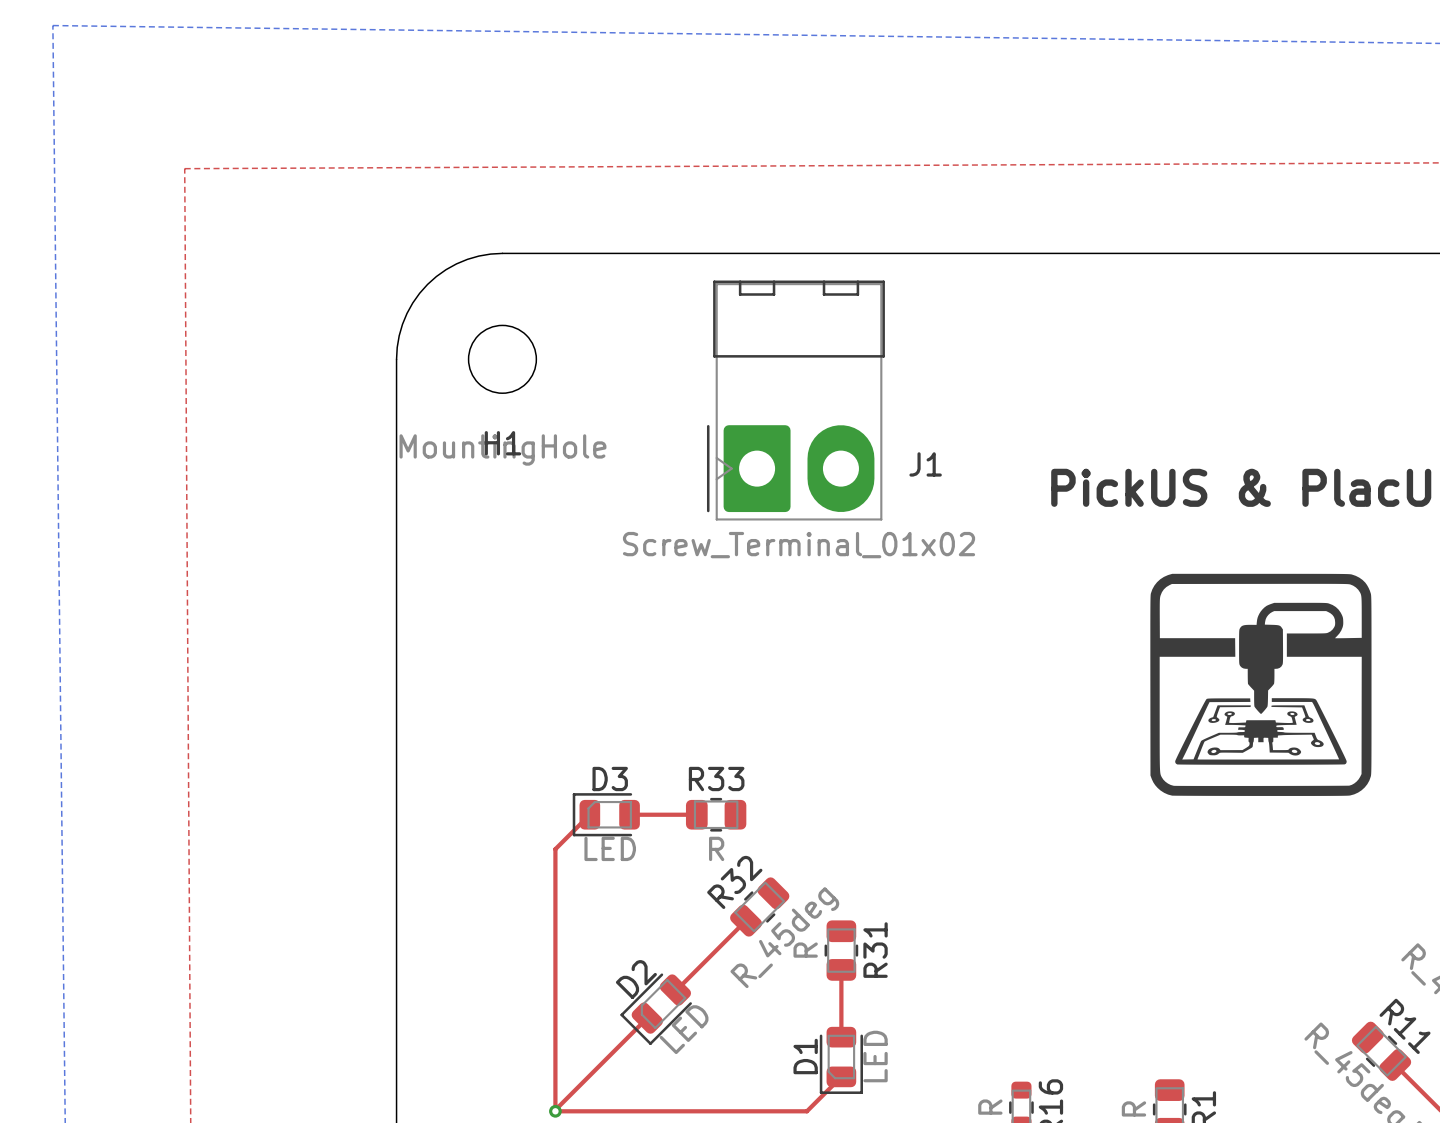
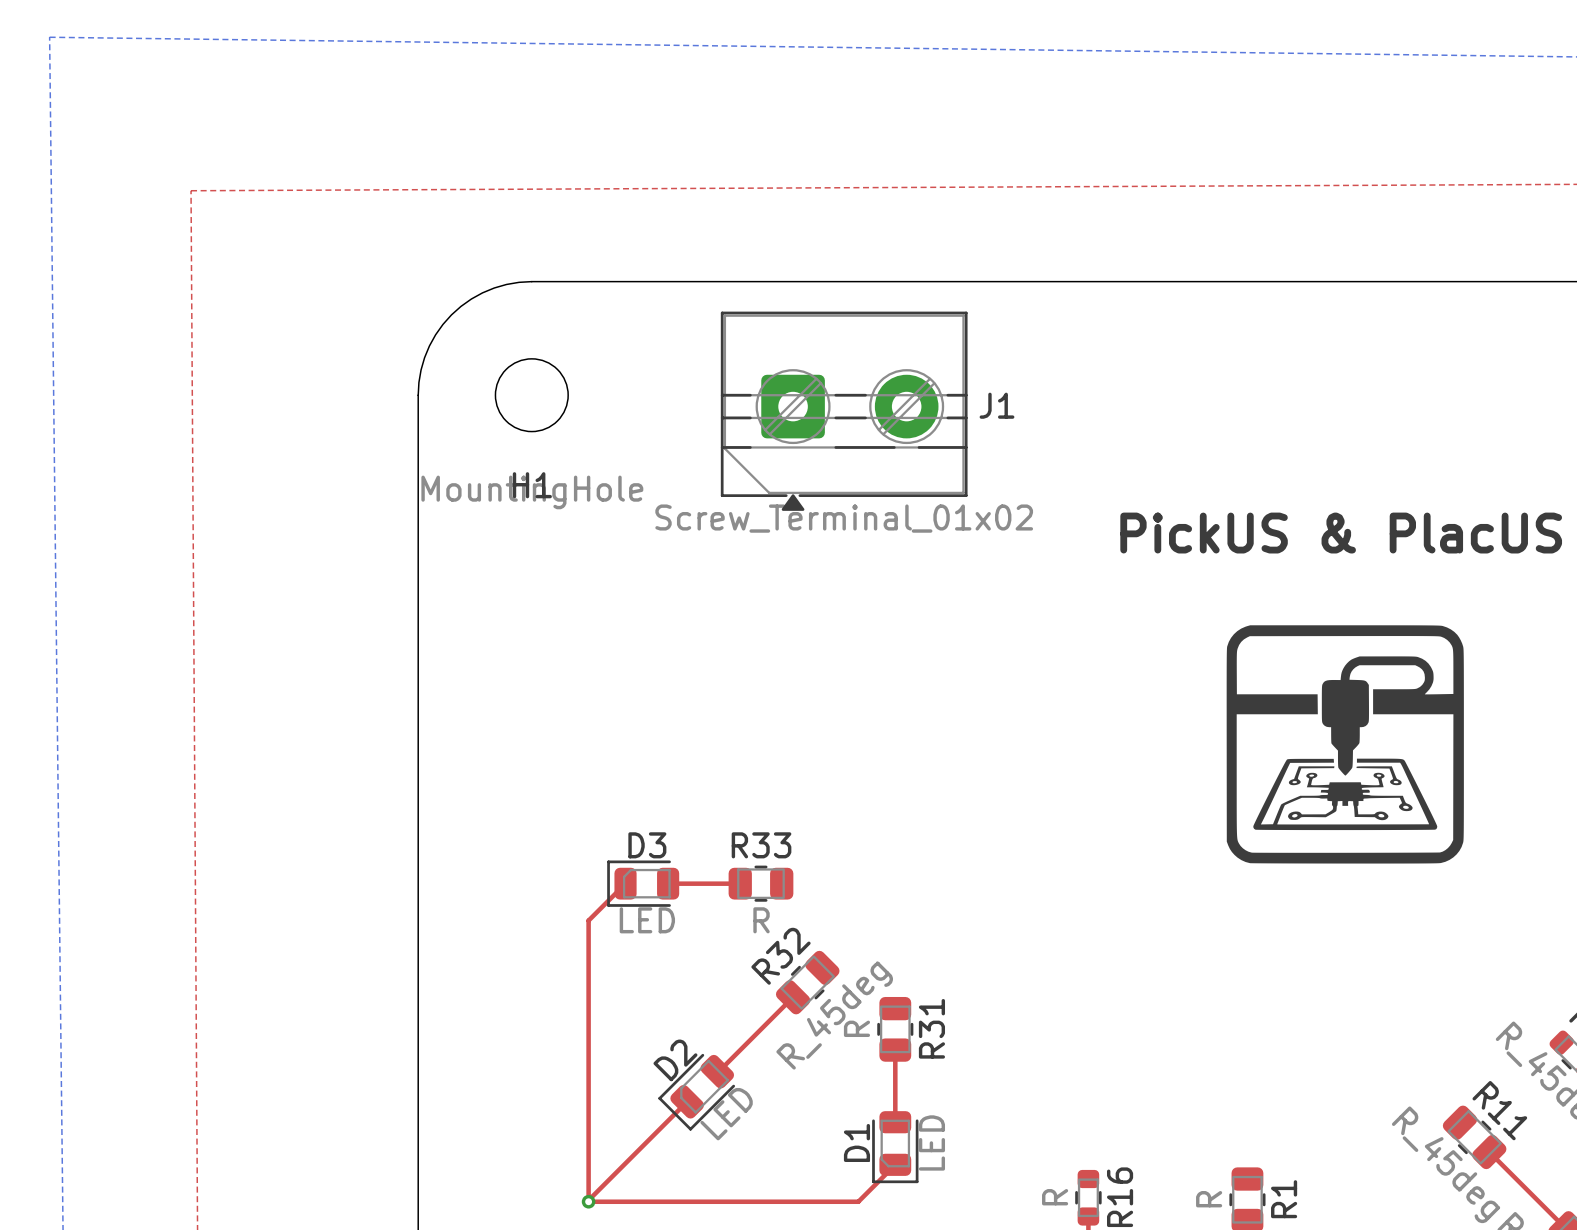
J1 footprint: [706, 280, 885, 521] -> [720, 311, 968, 511]
J1 name position: J1 (925, 464) -> J1 (997, 405)
J1 value position: Screw_Terminal_01x02 (799, 545) -> Screw_Terminal_01x02 (844, 518)

